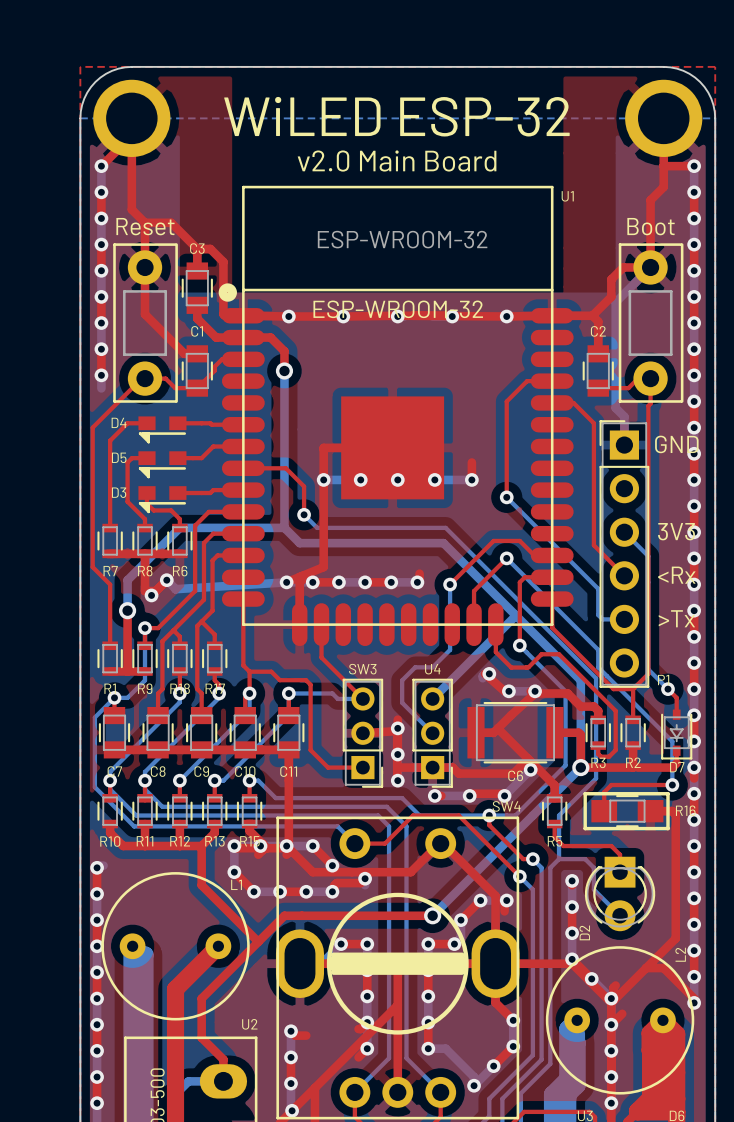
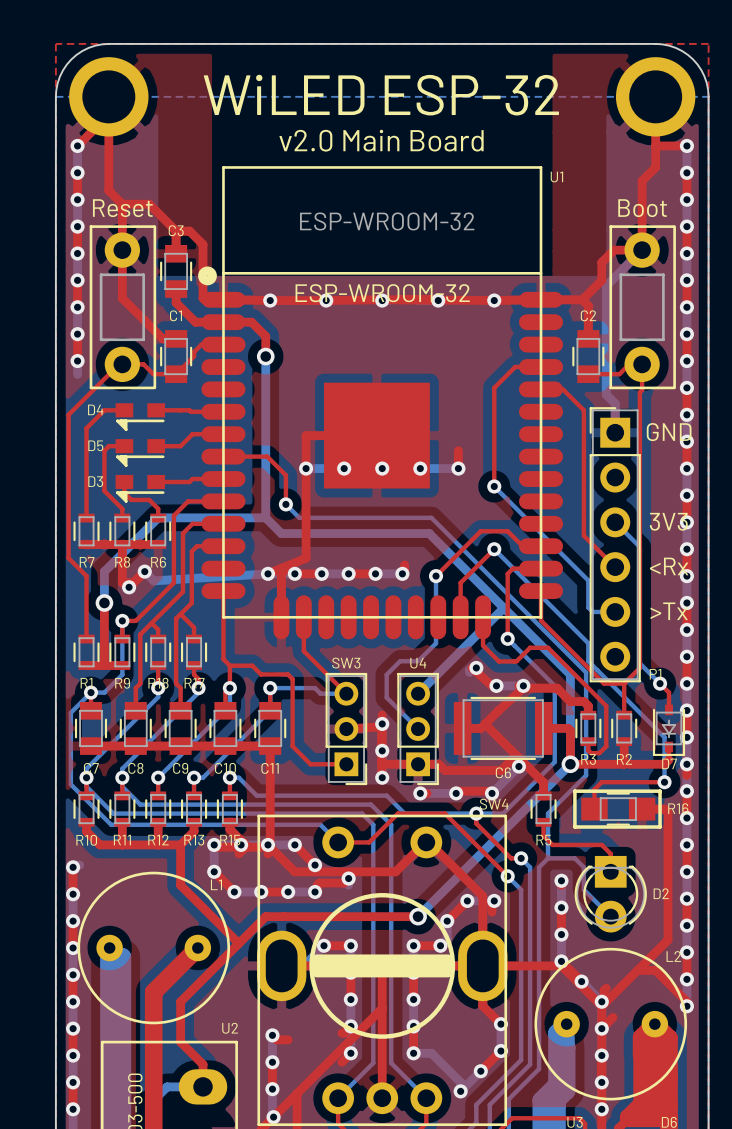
D2 name rotation: 0° (584, 932) -> 90° clockwise (661, 893)
D2 name position: D2 (584, 932) -> D2 (661, 893)
L2 name rotation: 0° (680, 954) -> 90° clockwise (673, 956)

